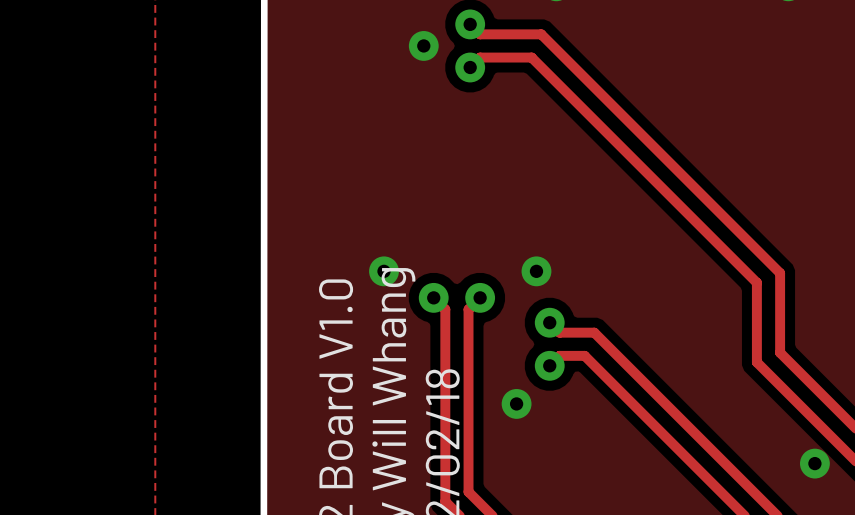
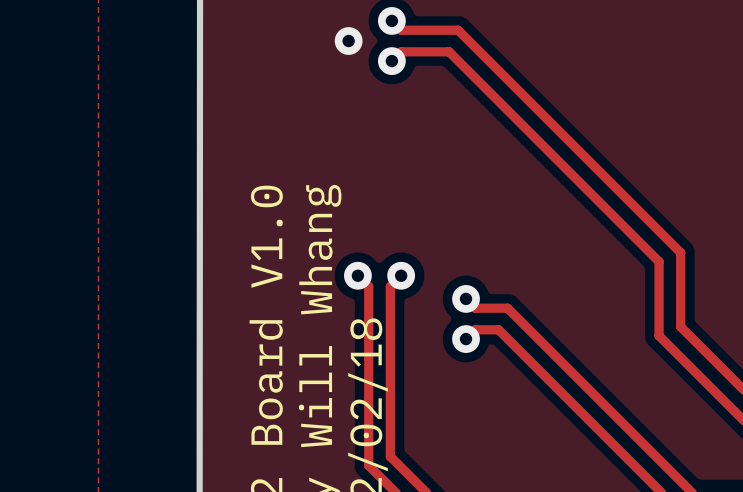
via: (384, 271) -> none
via: (536, 271) -> none
via: (516, 403) -> none
via: (814, 463) -> none

